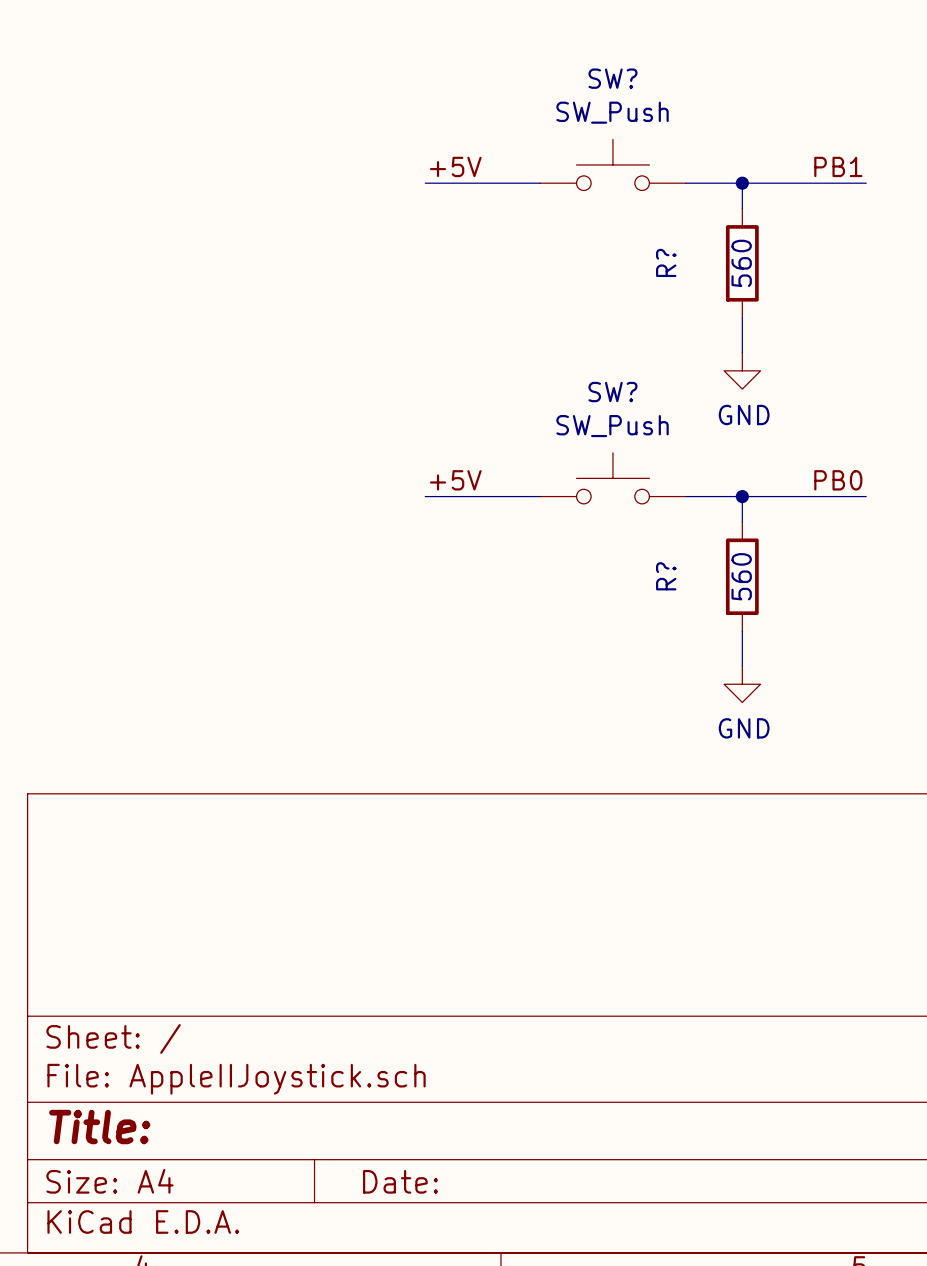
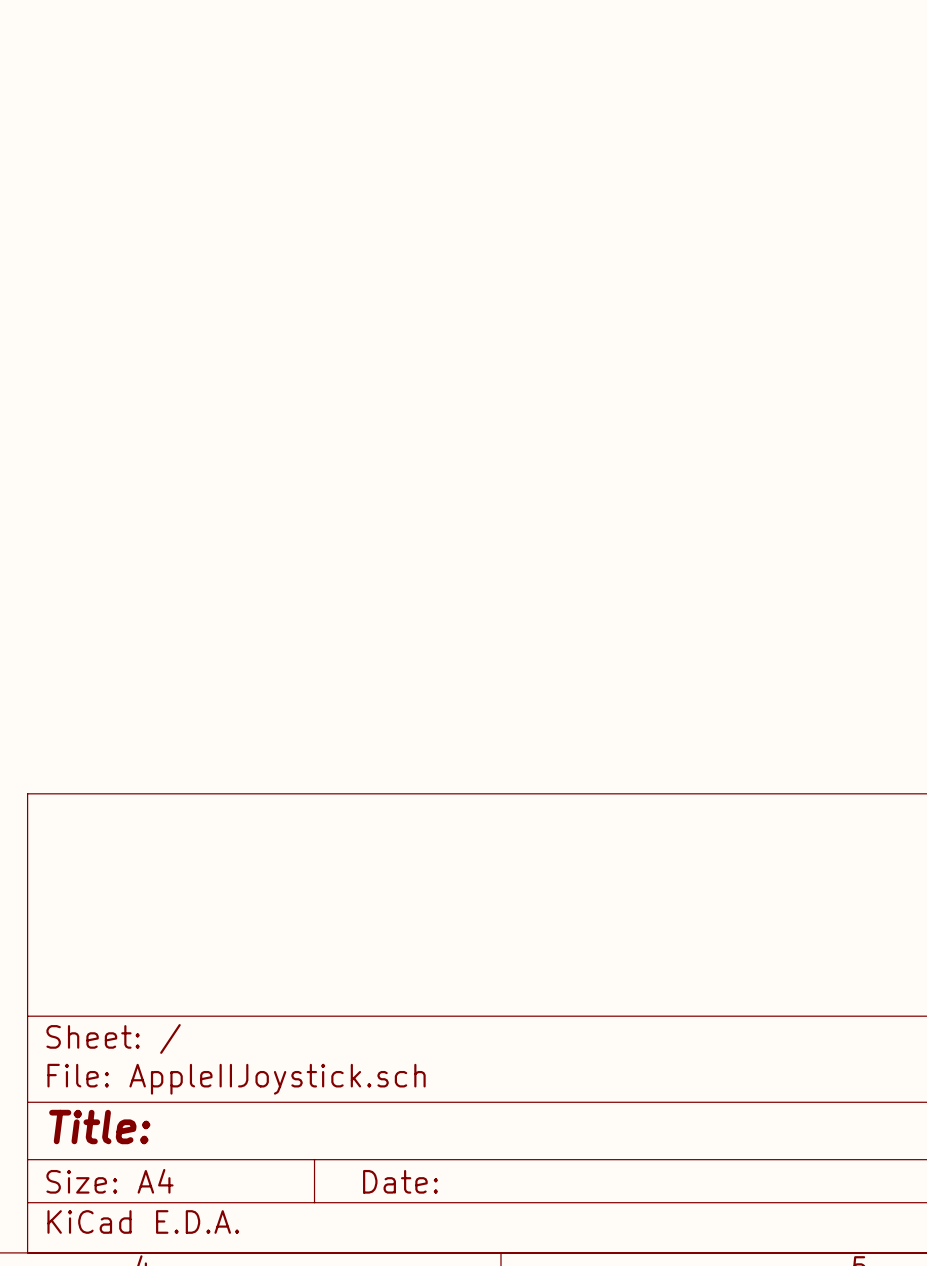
SW?: SW_Push (612, 164) -> none
label: +5V (455, 166) -> none
label: PB1 (838, 166) -> none
wire: (425, 183) (540, 183) -> none
wire: (685, 183) (866, 183) -> none
wire: (742, 183) (742, 208) -> none
junction: (742, 183) -> none
R?: 560 (742, 263) -> none
wire: (742, 318) (742, 352) -> none
power symbol: GND (742, 370) -> none
SW?: SW_Push (612, 478) -> none
label: +5V (455, 480) -> none
label: PB0 (838, 480) -> none
wire: (425, 496) (540, 496) -> none
wire: (685, 496) (866, 496) -> none
wire: (742, 496) (742, 522) -> none
junction: (742, 496) -> none
R?: 560 (742, 576) -> none
wire: (742, 631) (742, 666) -> none
power symbol: GND (742, 684) -> none

